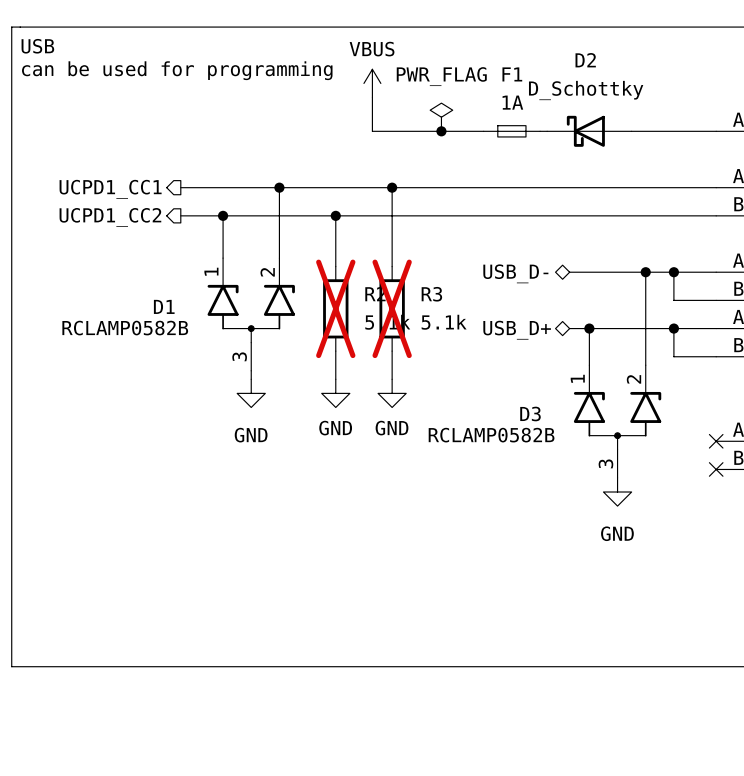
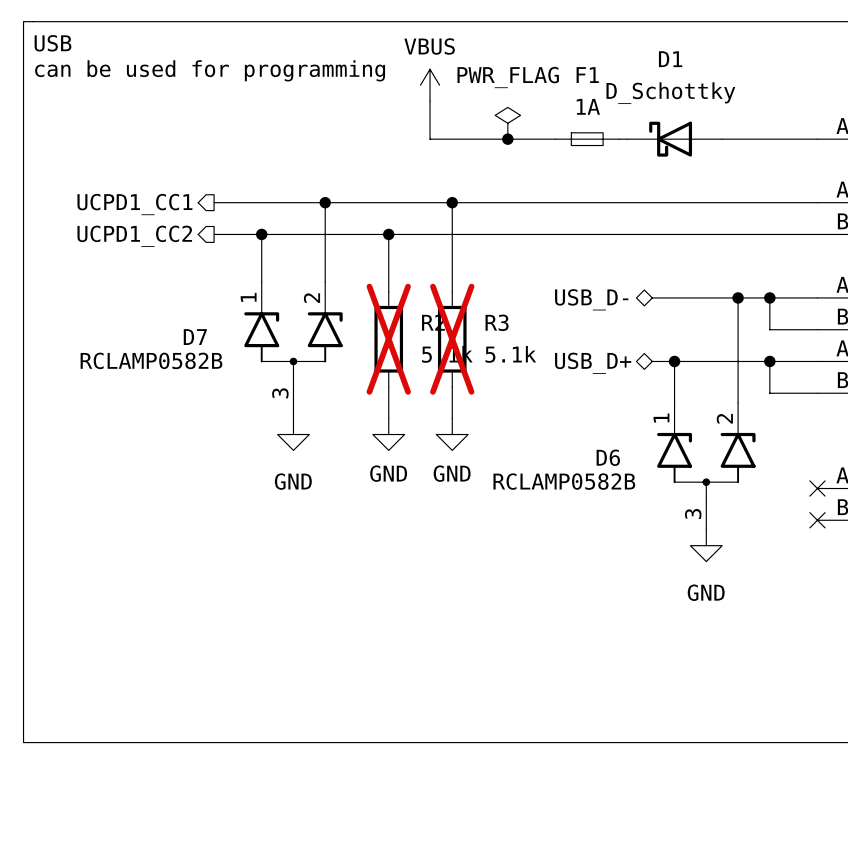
D2 name: D2 (585, 60) -> D1 (670, 59)
D1 name: D1 (164, 306) -> D7 (195, 337)
D3 name: D3 (530, 414) -> D6 (608, 457)

